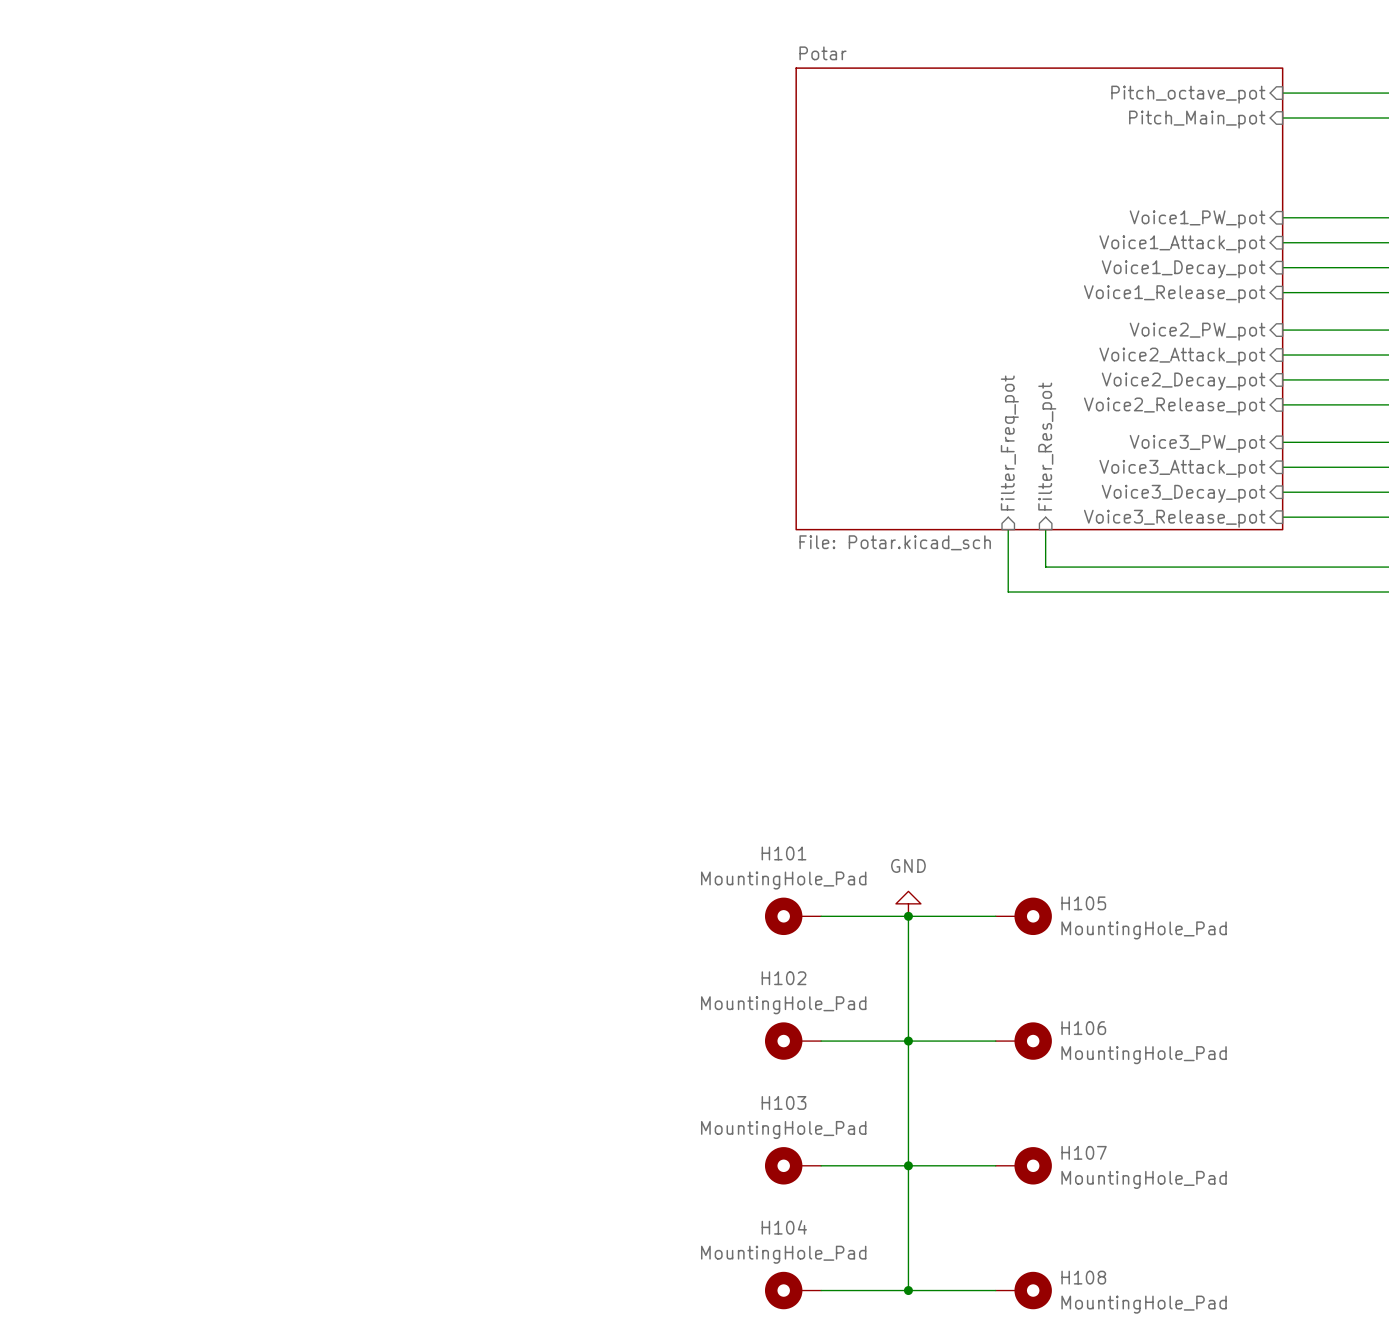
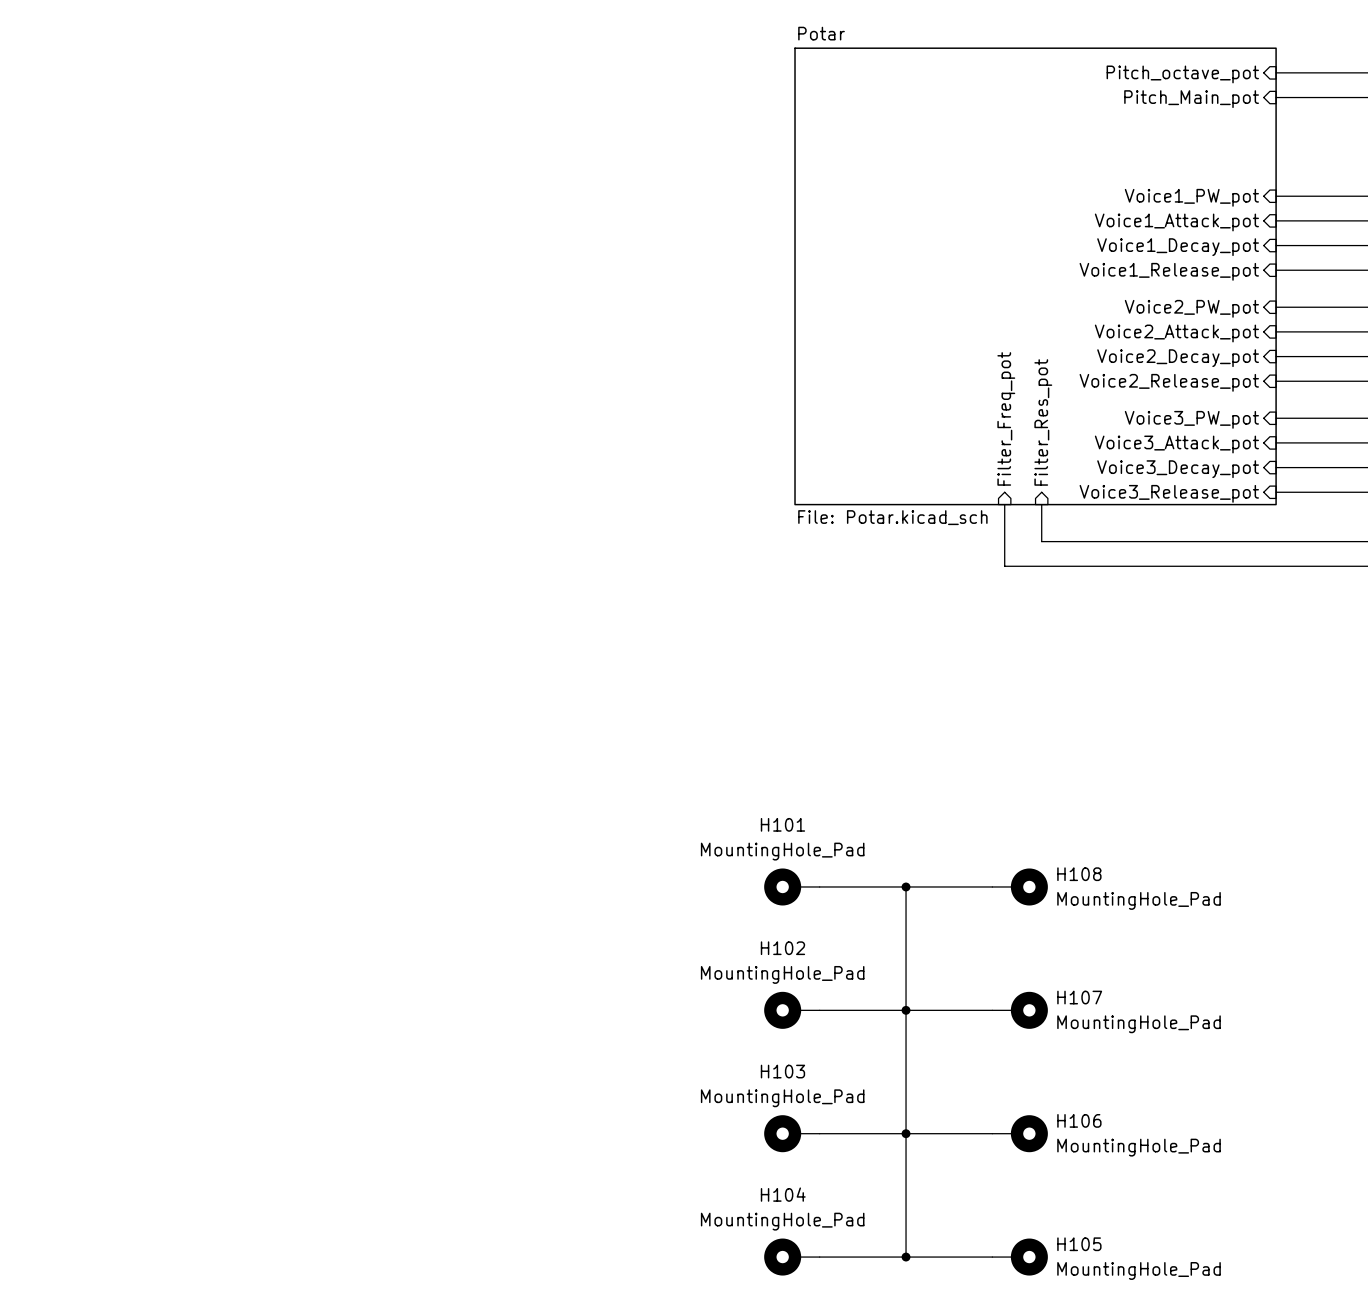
power symbol: GND (908, 903) -> none
H105 name: H105 (1083, 903) -> H108 (1079, 874)
H106 name: H106 (1083, 1028) -> H107 (1079, 997)
H107 name: H107 (1084, 1152) -> H106 (1079, 1120)
H108 name: H108 (1083, 1277) -> H105 (1079, 1244)

